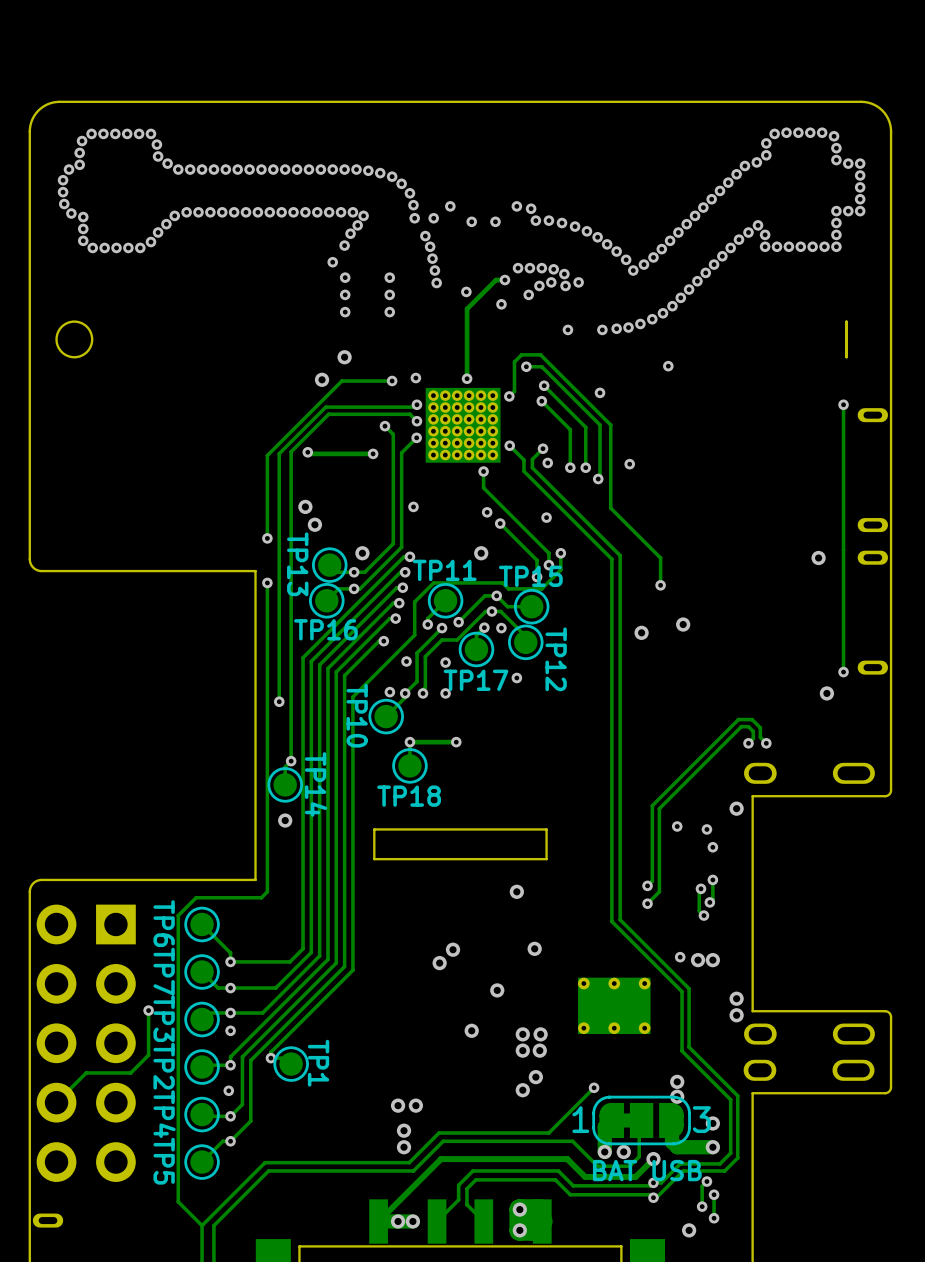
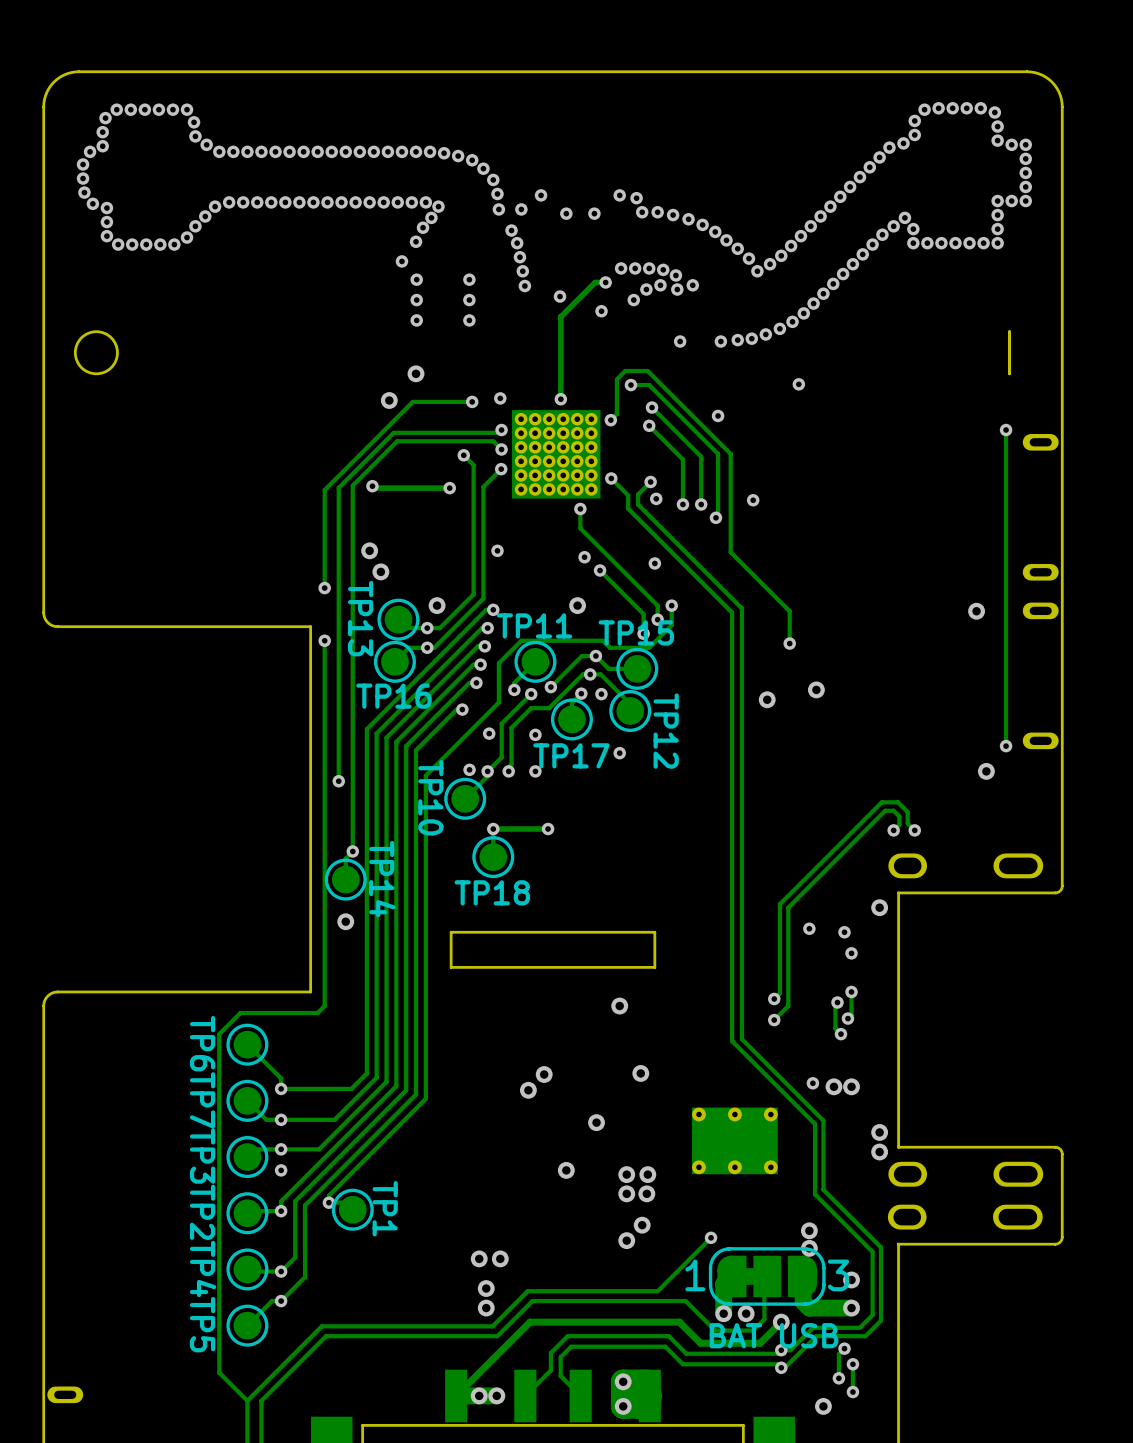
track: (148, 1010) (148, 1055) (130, 1072) (86, 1072) (56, 1102) -> none
via: (148, 1010) -> none
part: (86, 1043) -> none
via: (228, 1090) -> none

